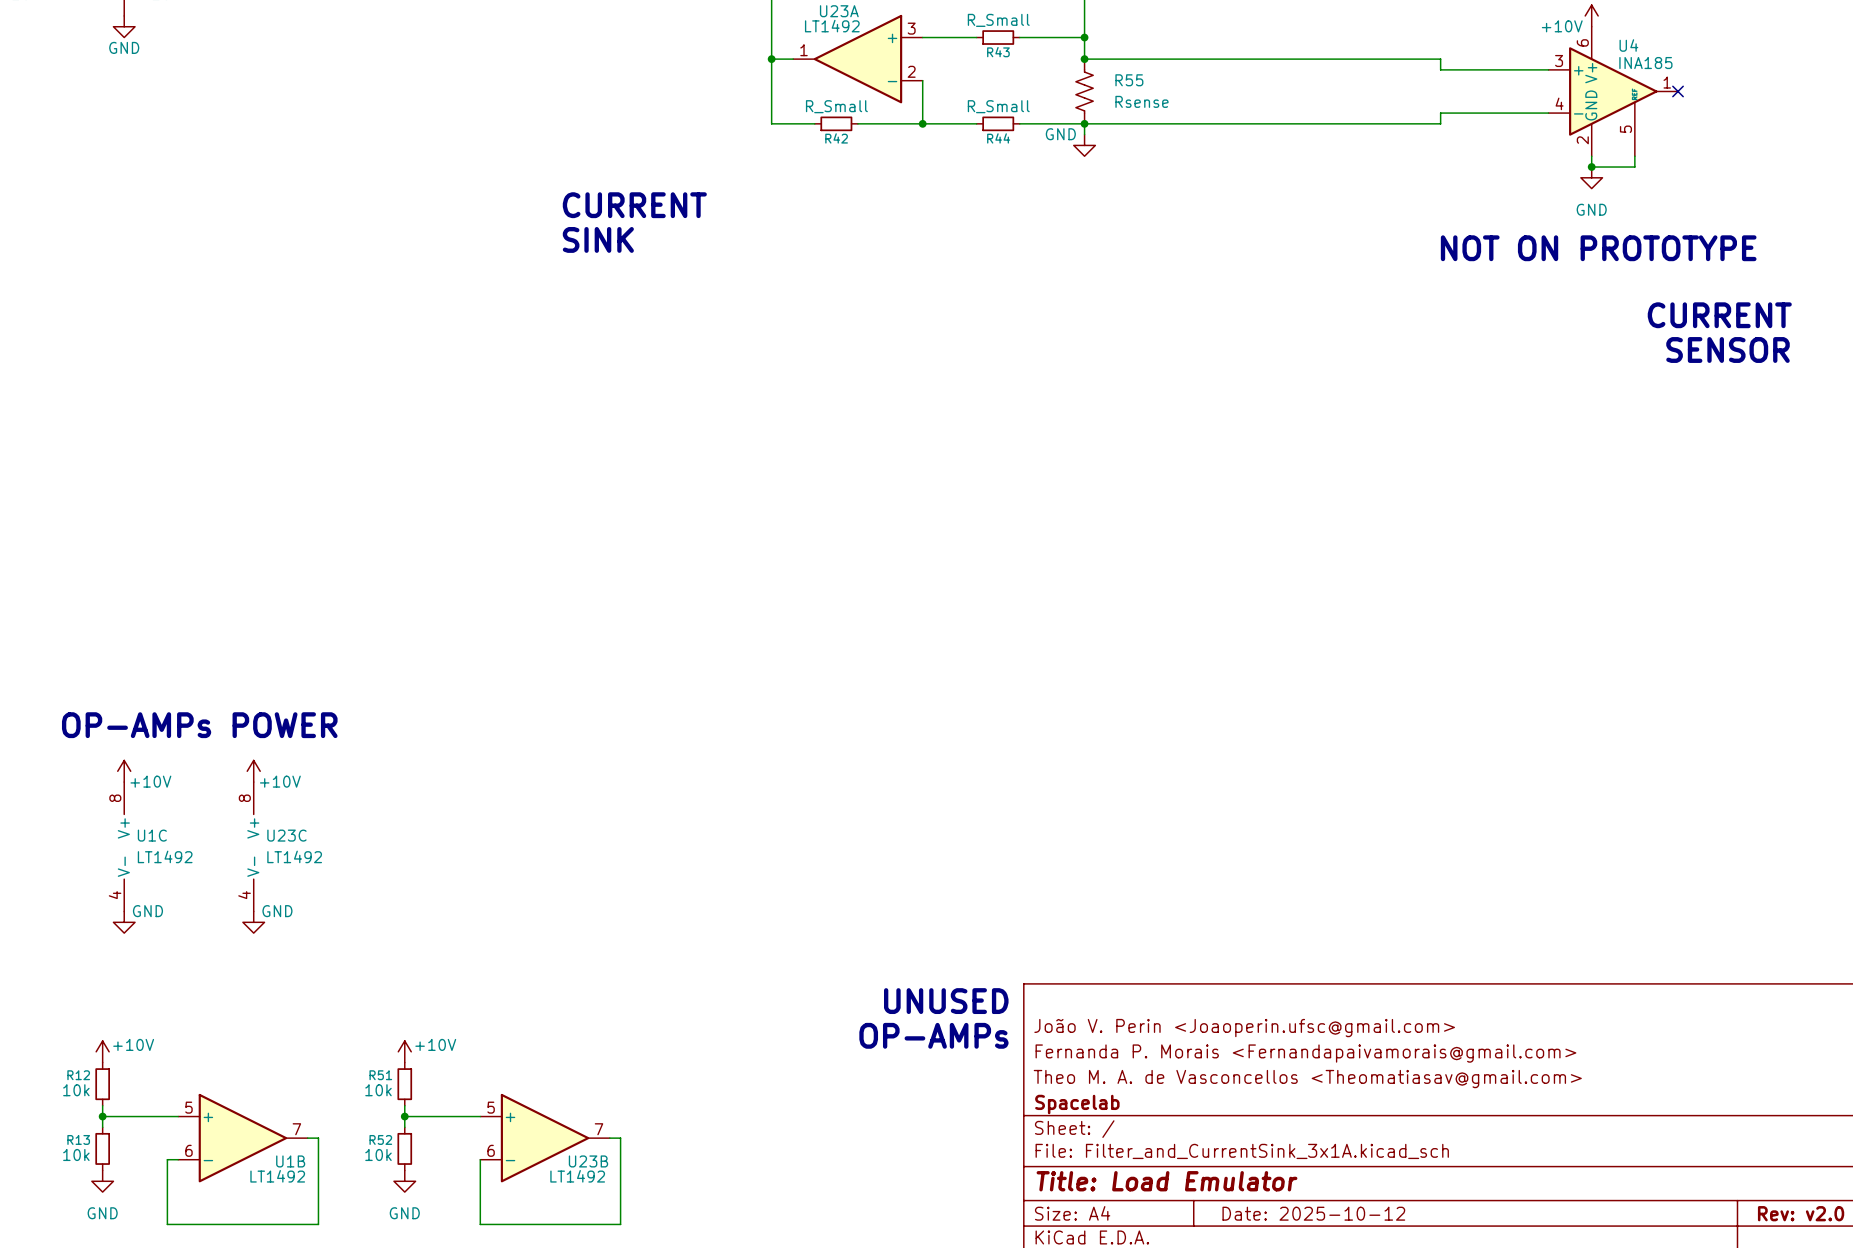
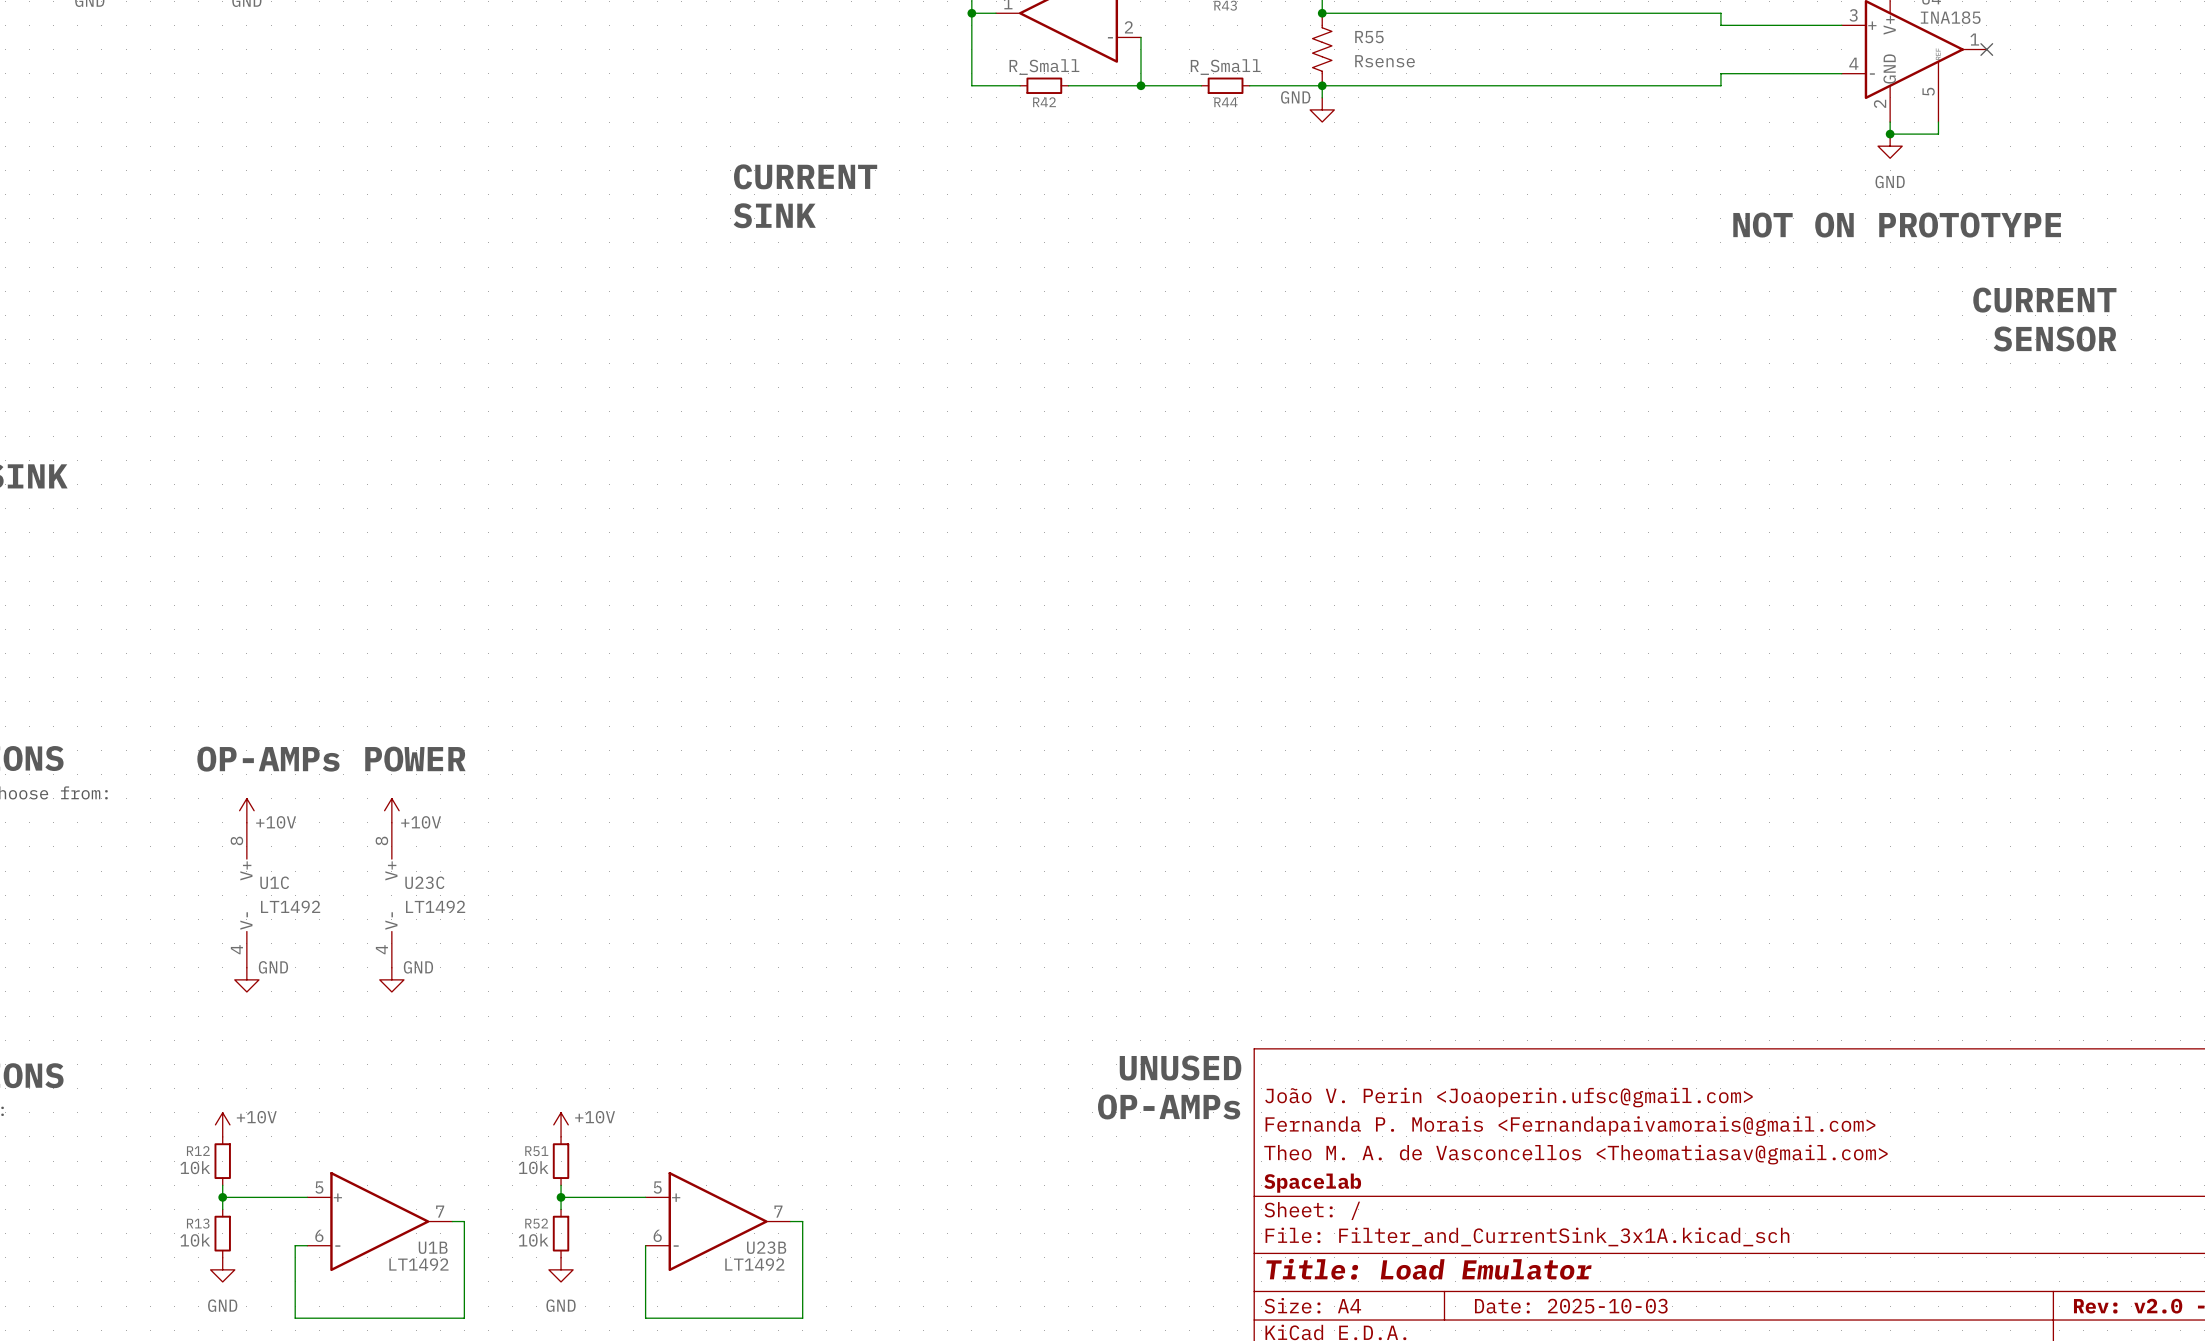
title block: Date: 2025-10-12 (1313, 1213) -> Date: 2025-10-03 (1571, 1306)

